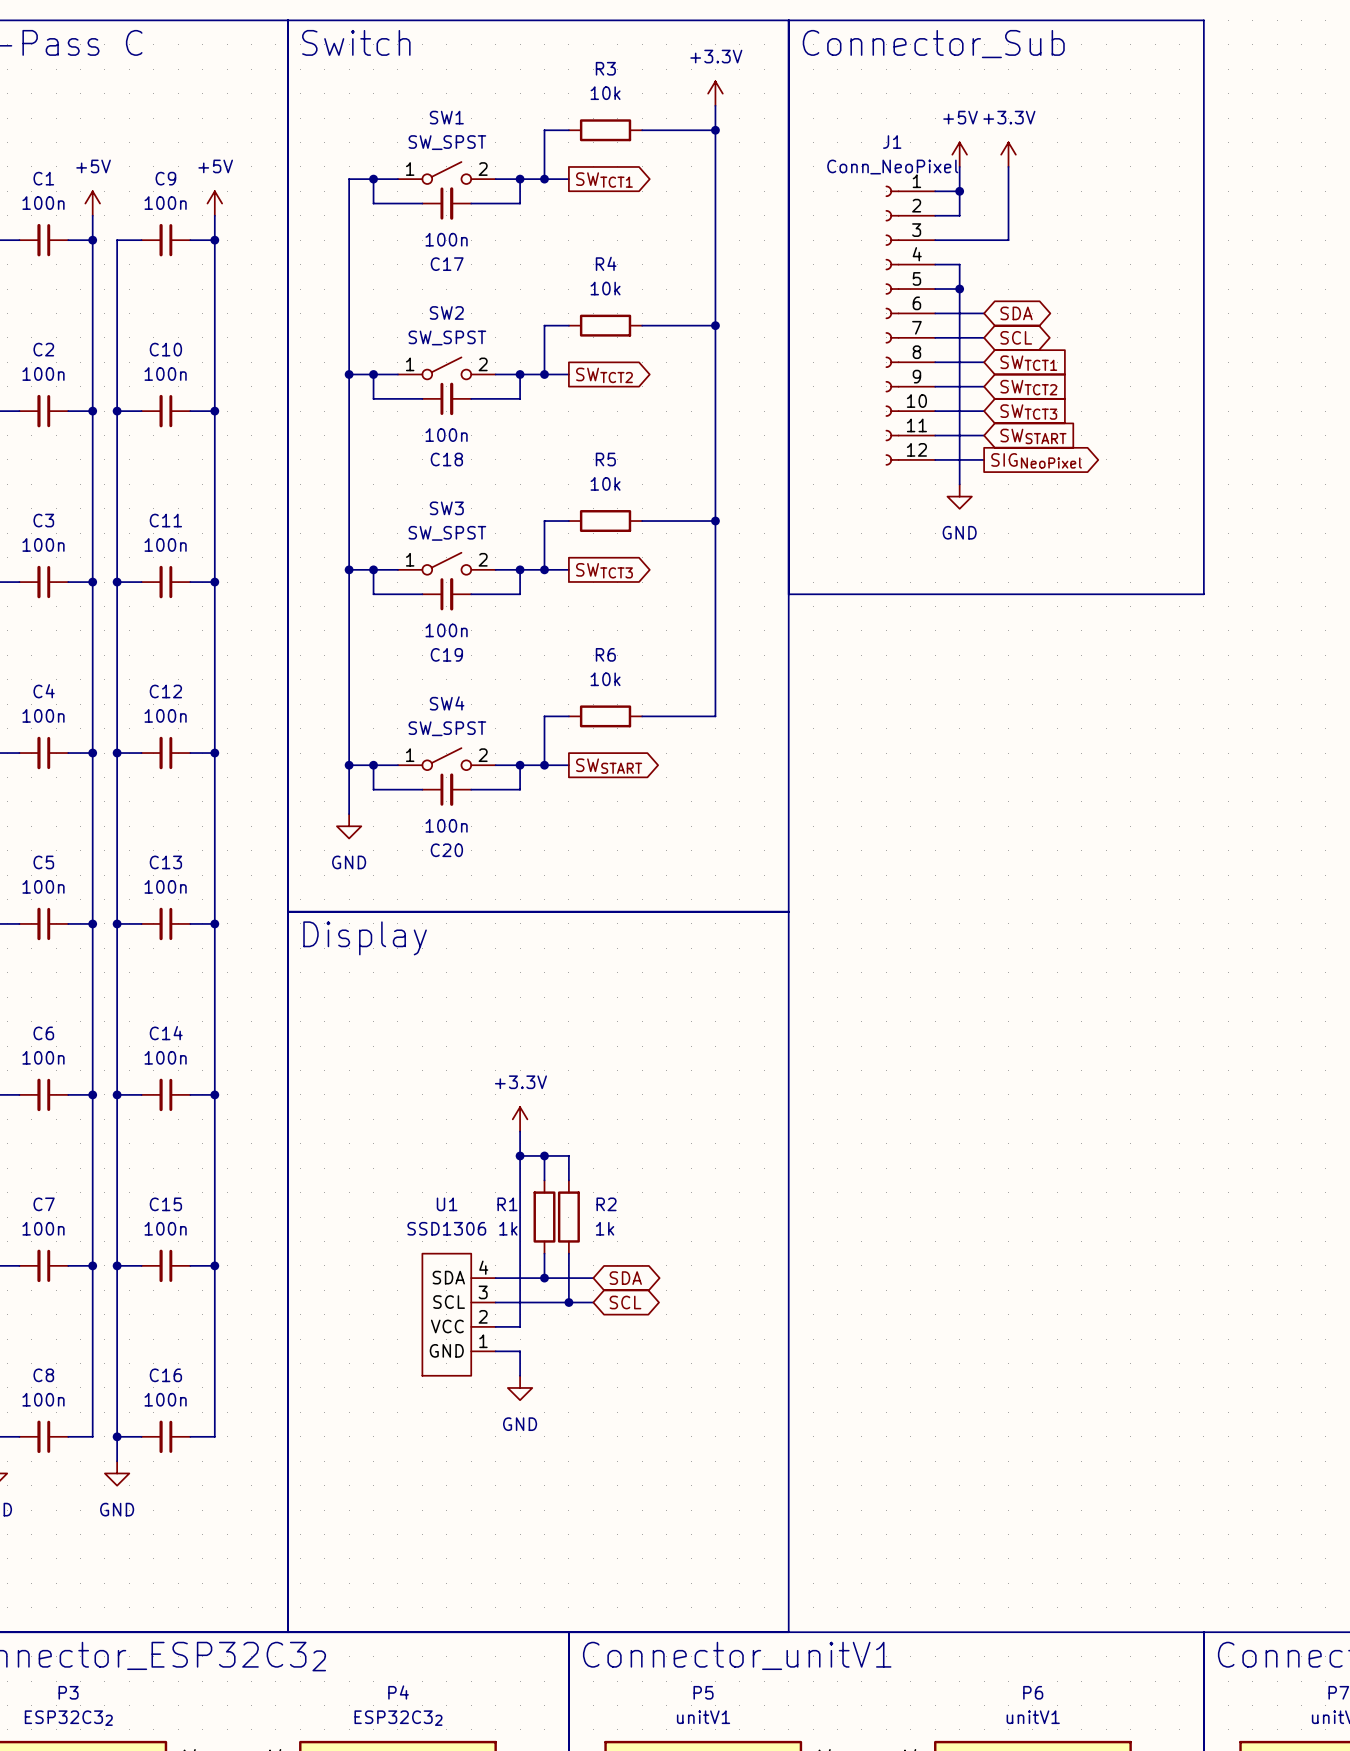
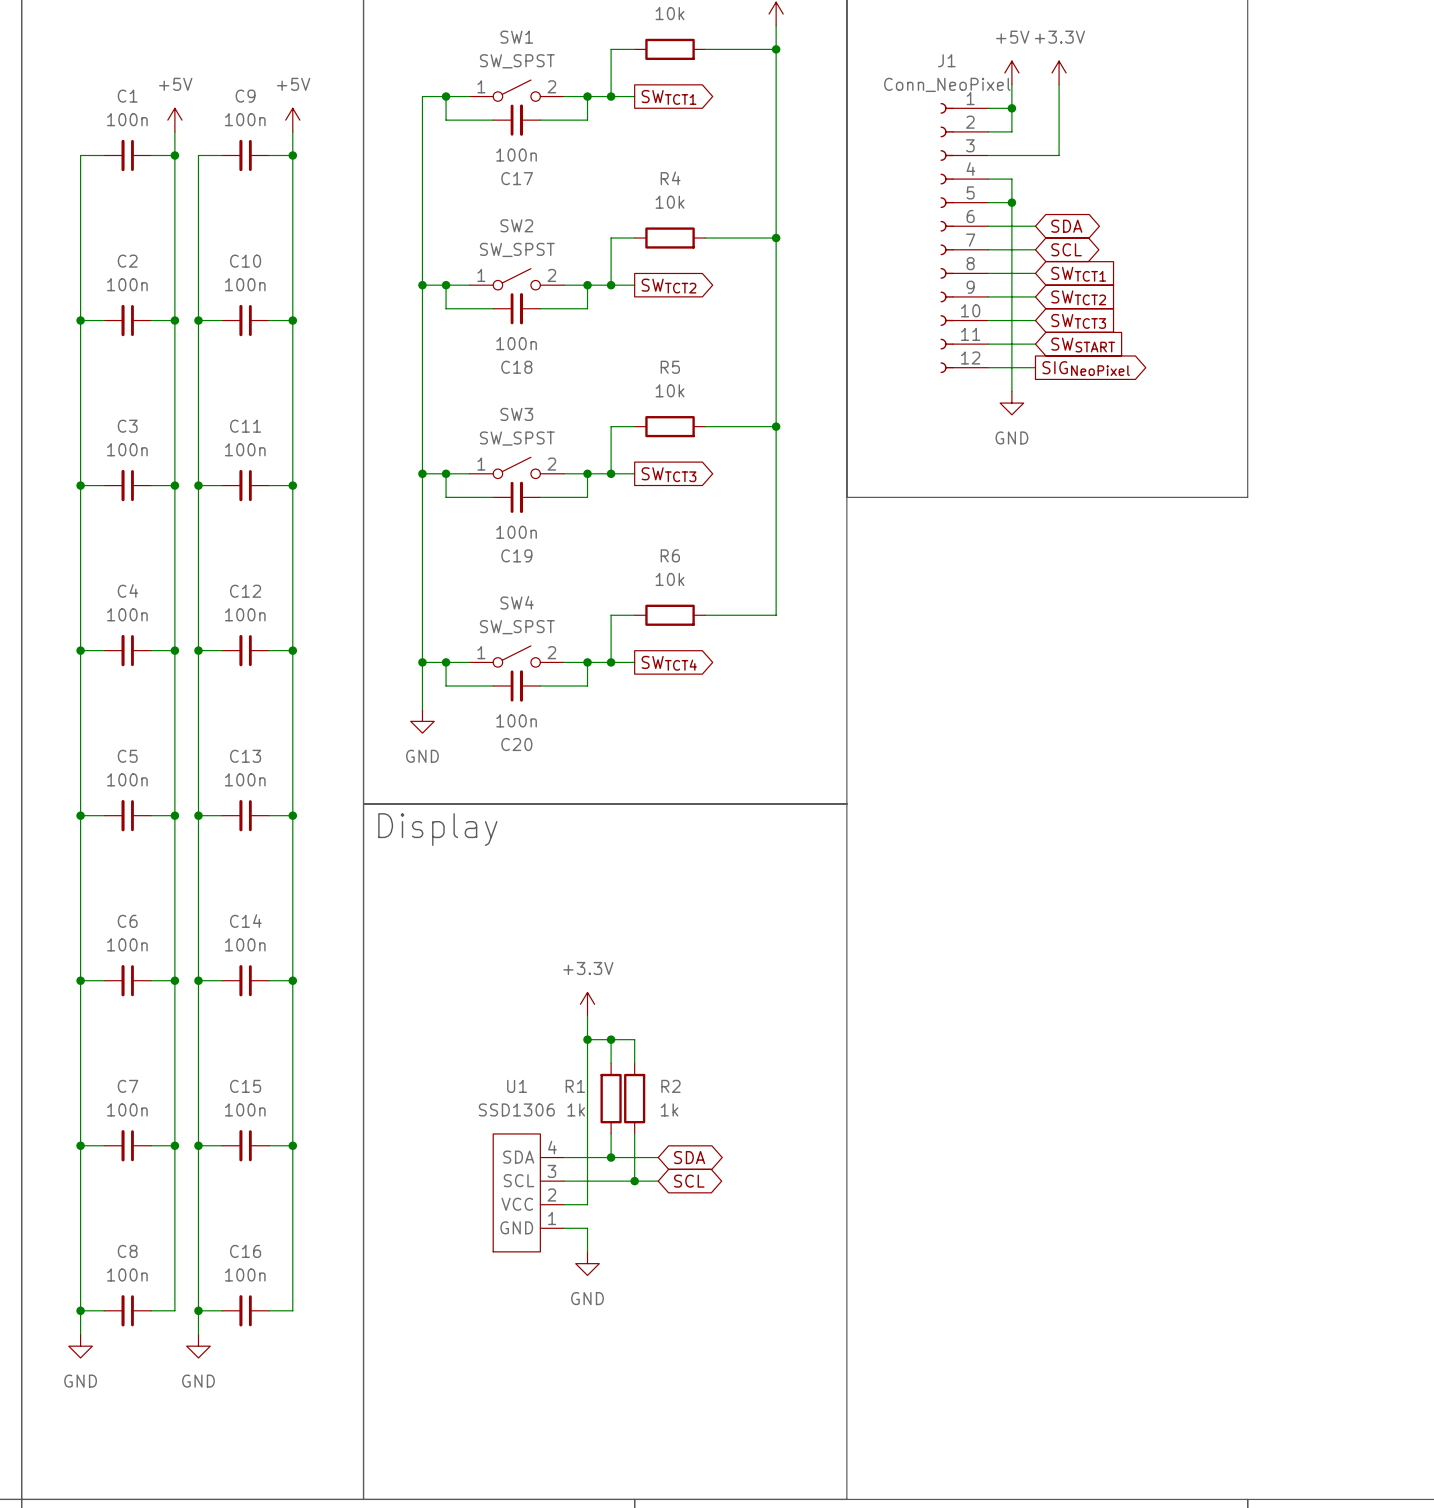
global label: SWSTART (609, 766) -> SWTCT4 (669, 663)

